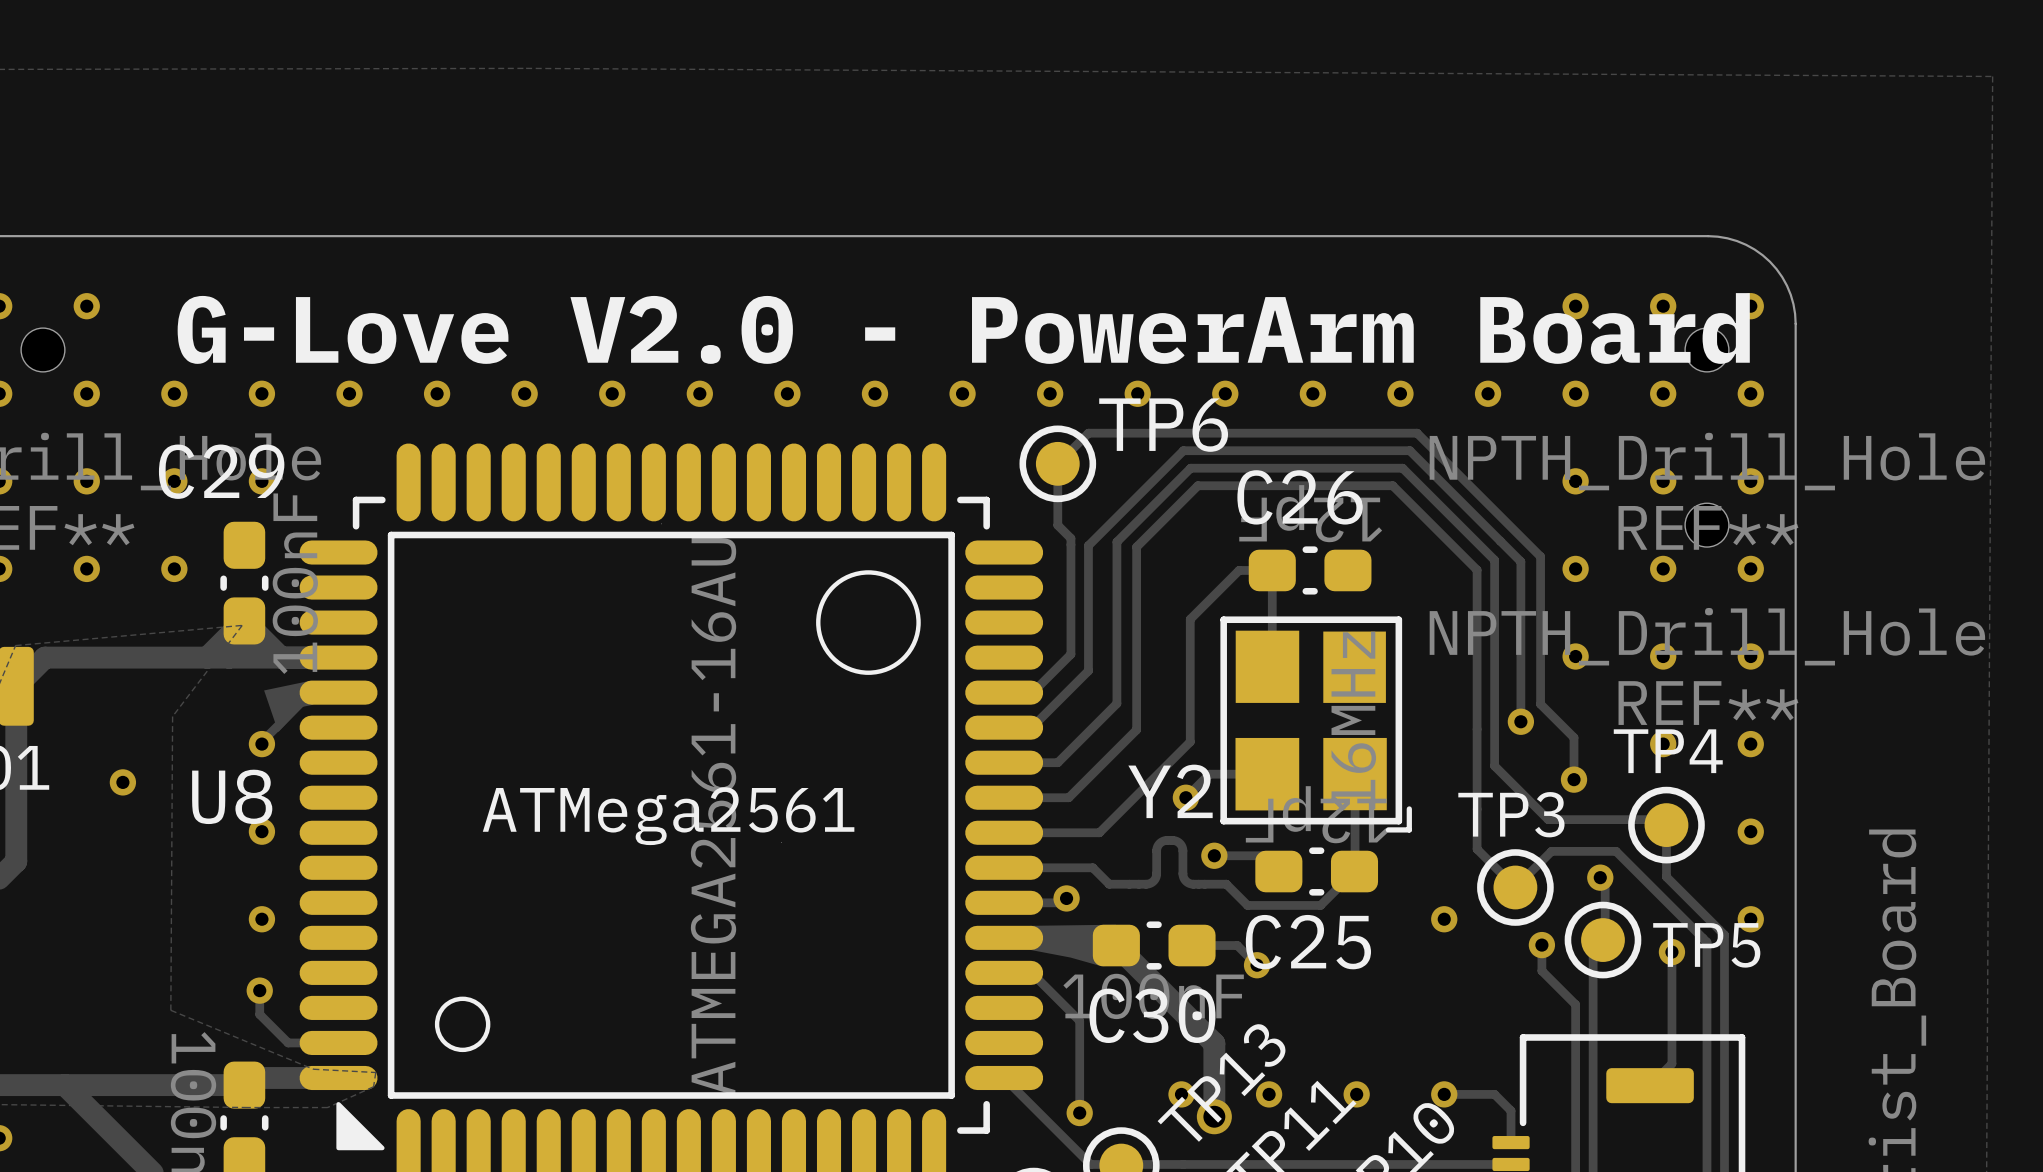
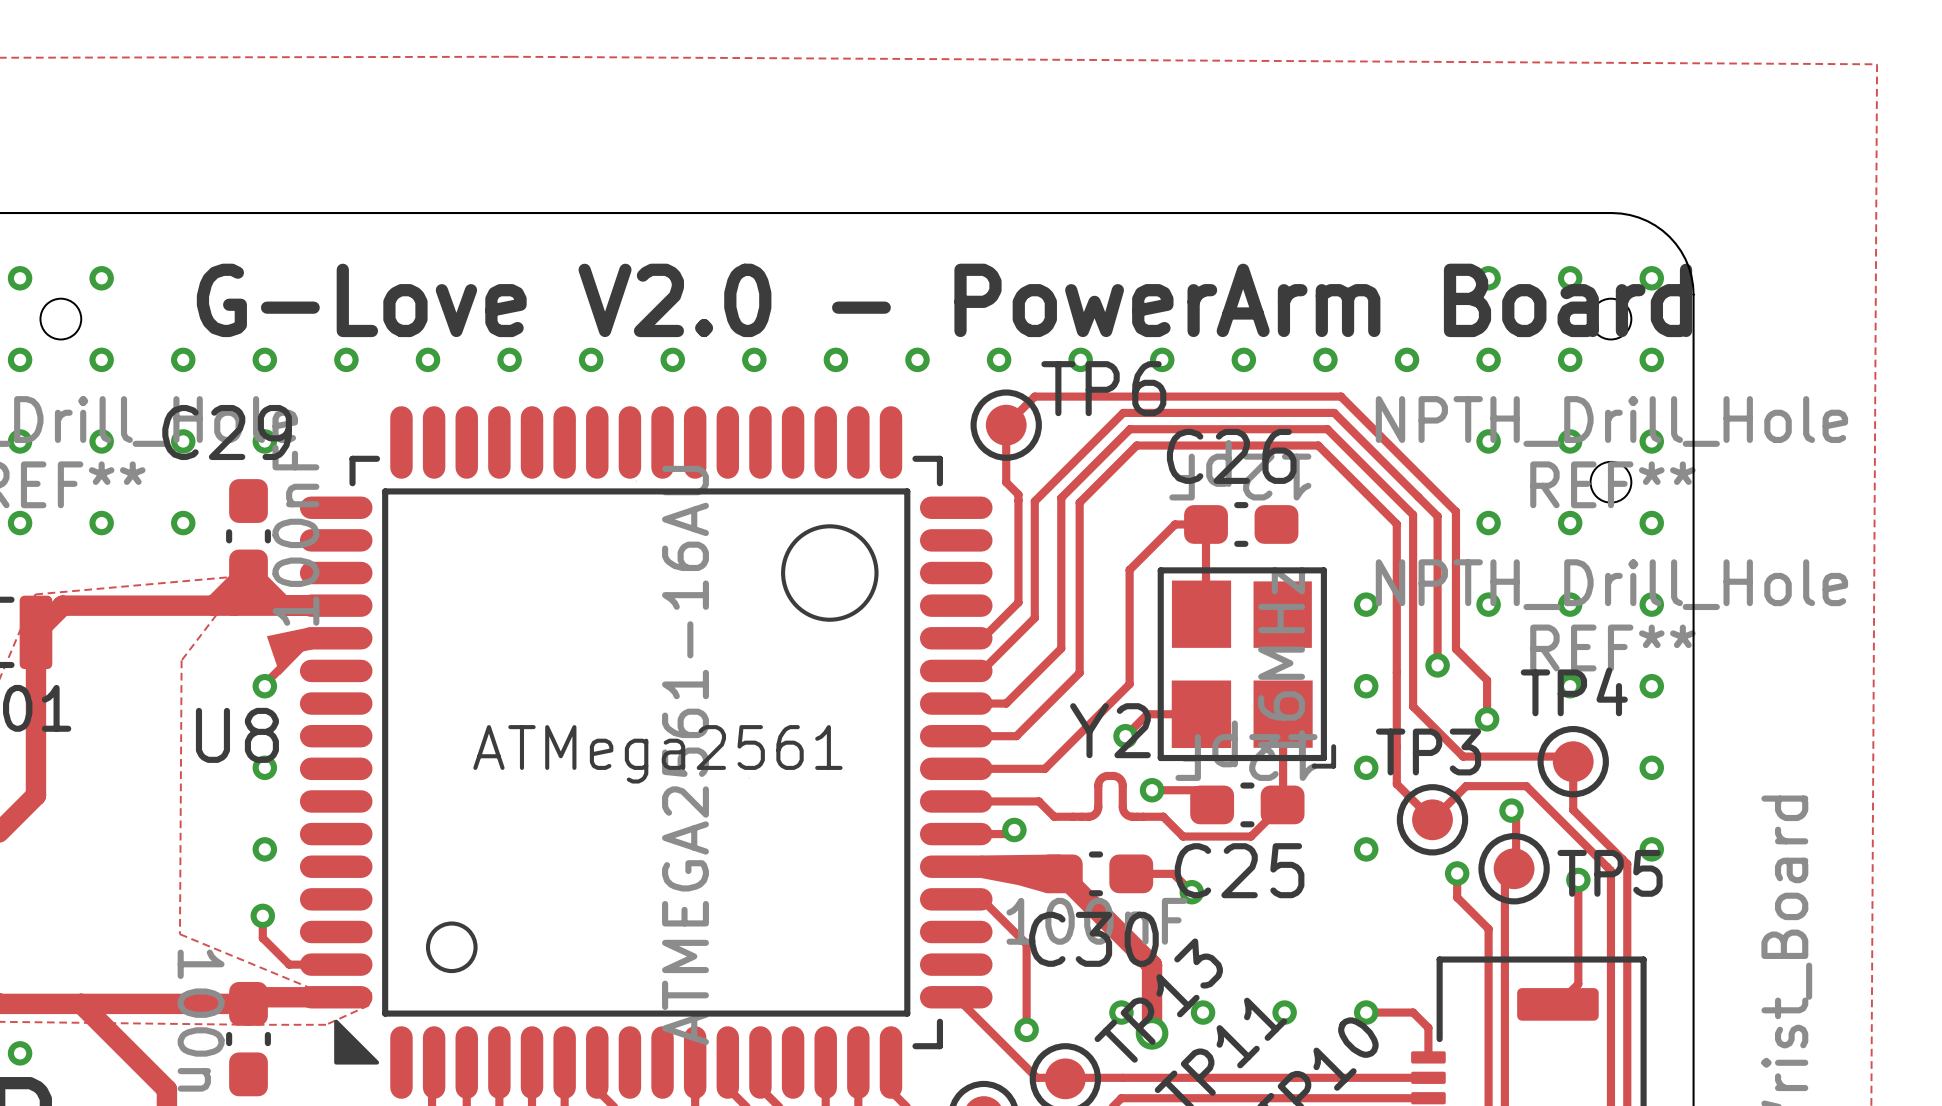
via: none -> (1366, 604)
via: none -> (1366, 686)
via: (122, 782) -> none
via: none -> (1366, 767)

